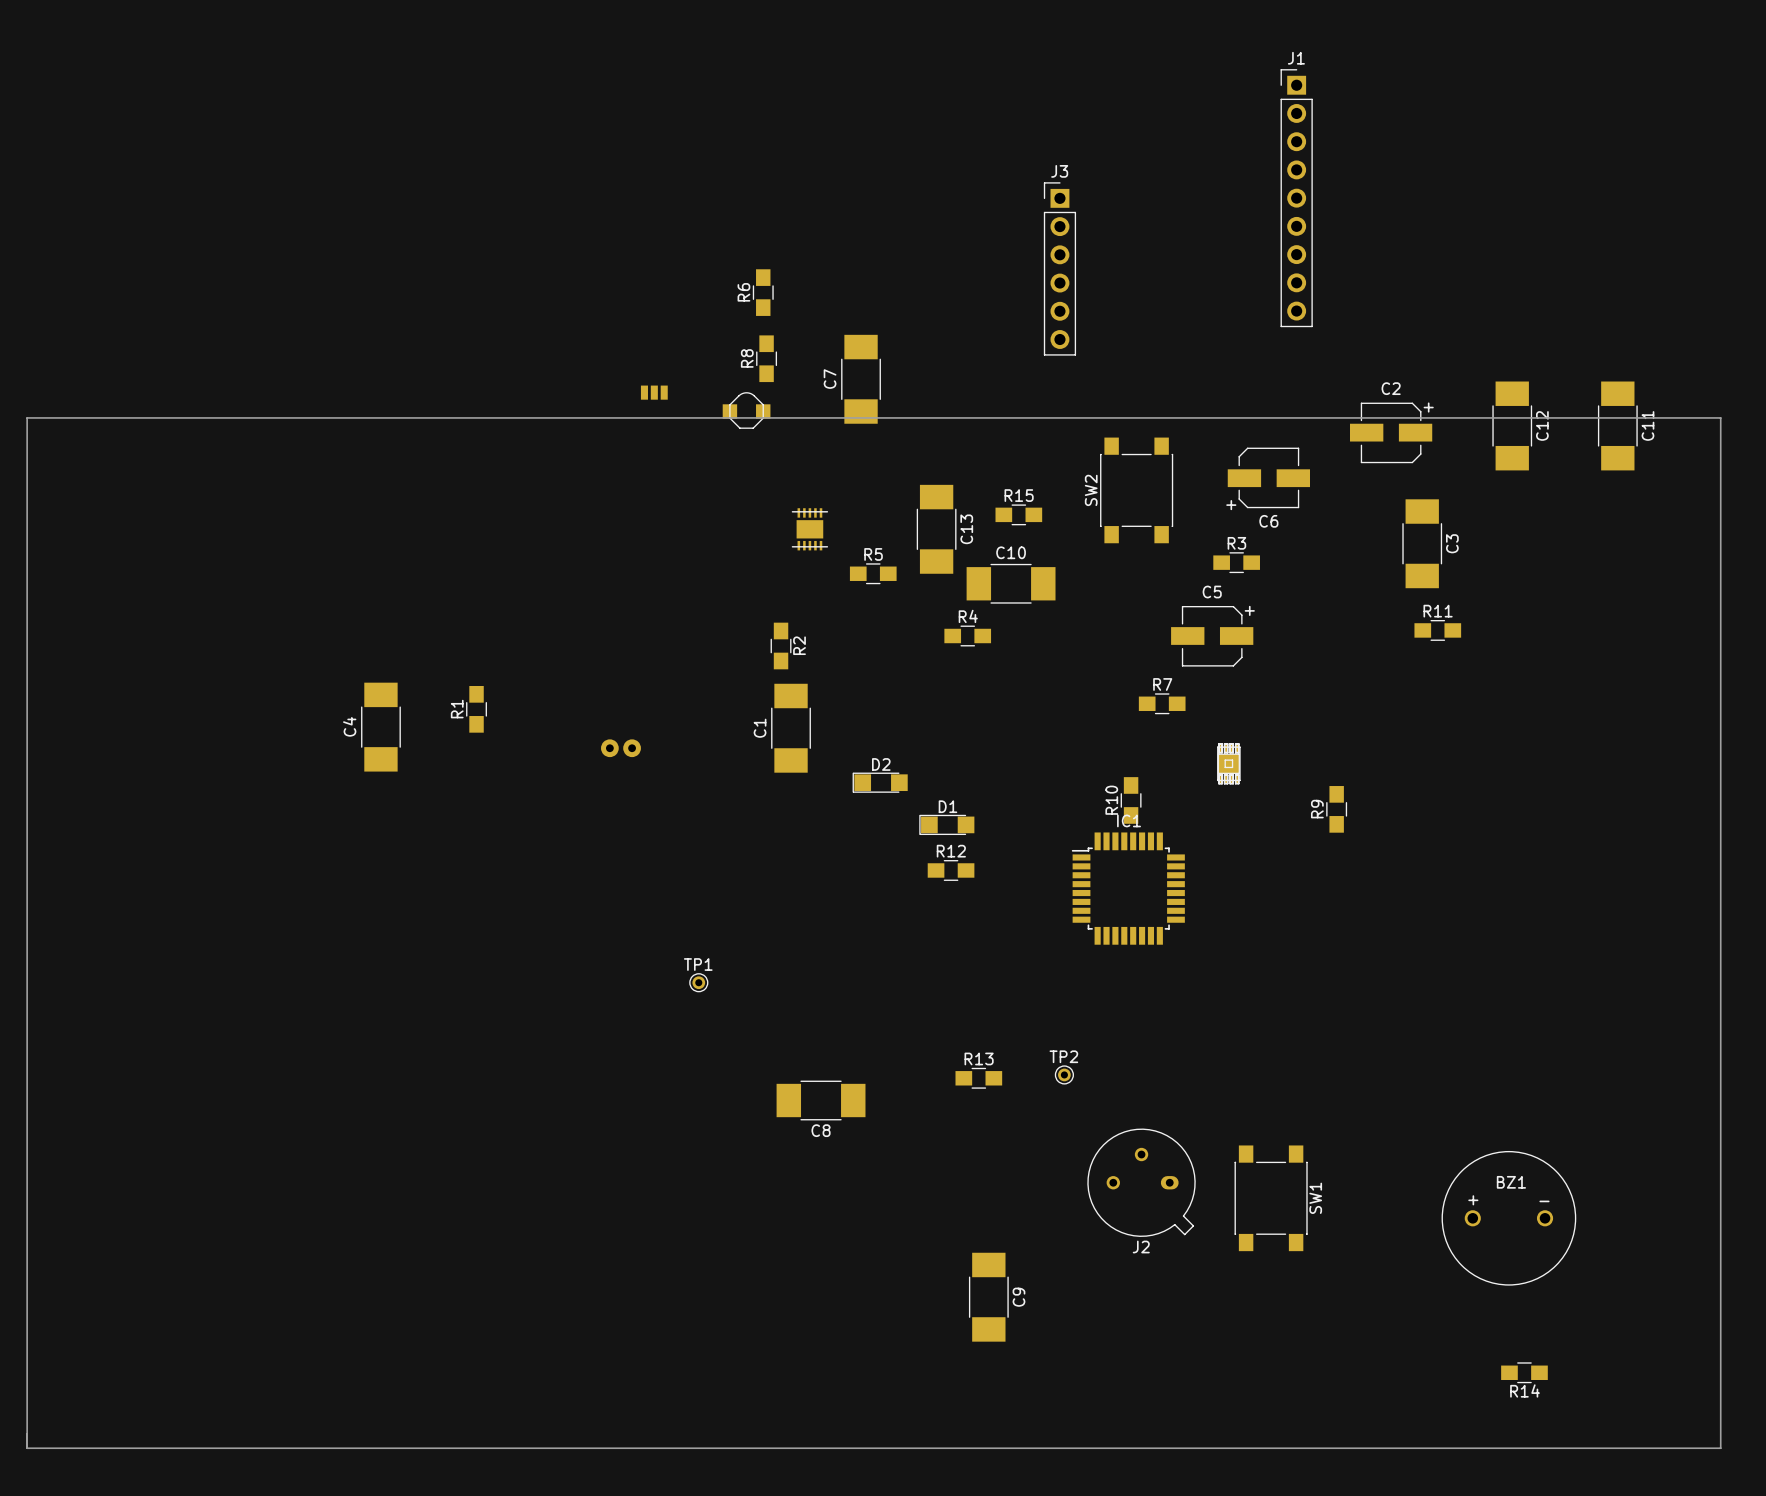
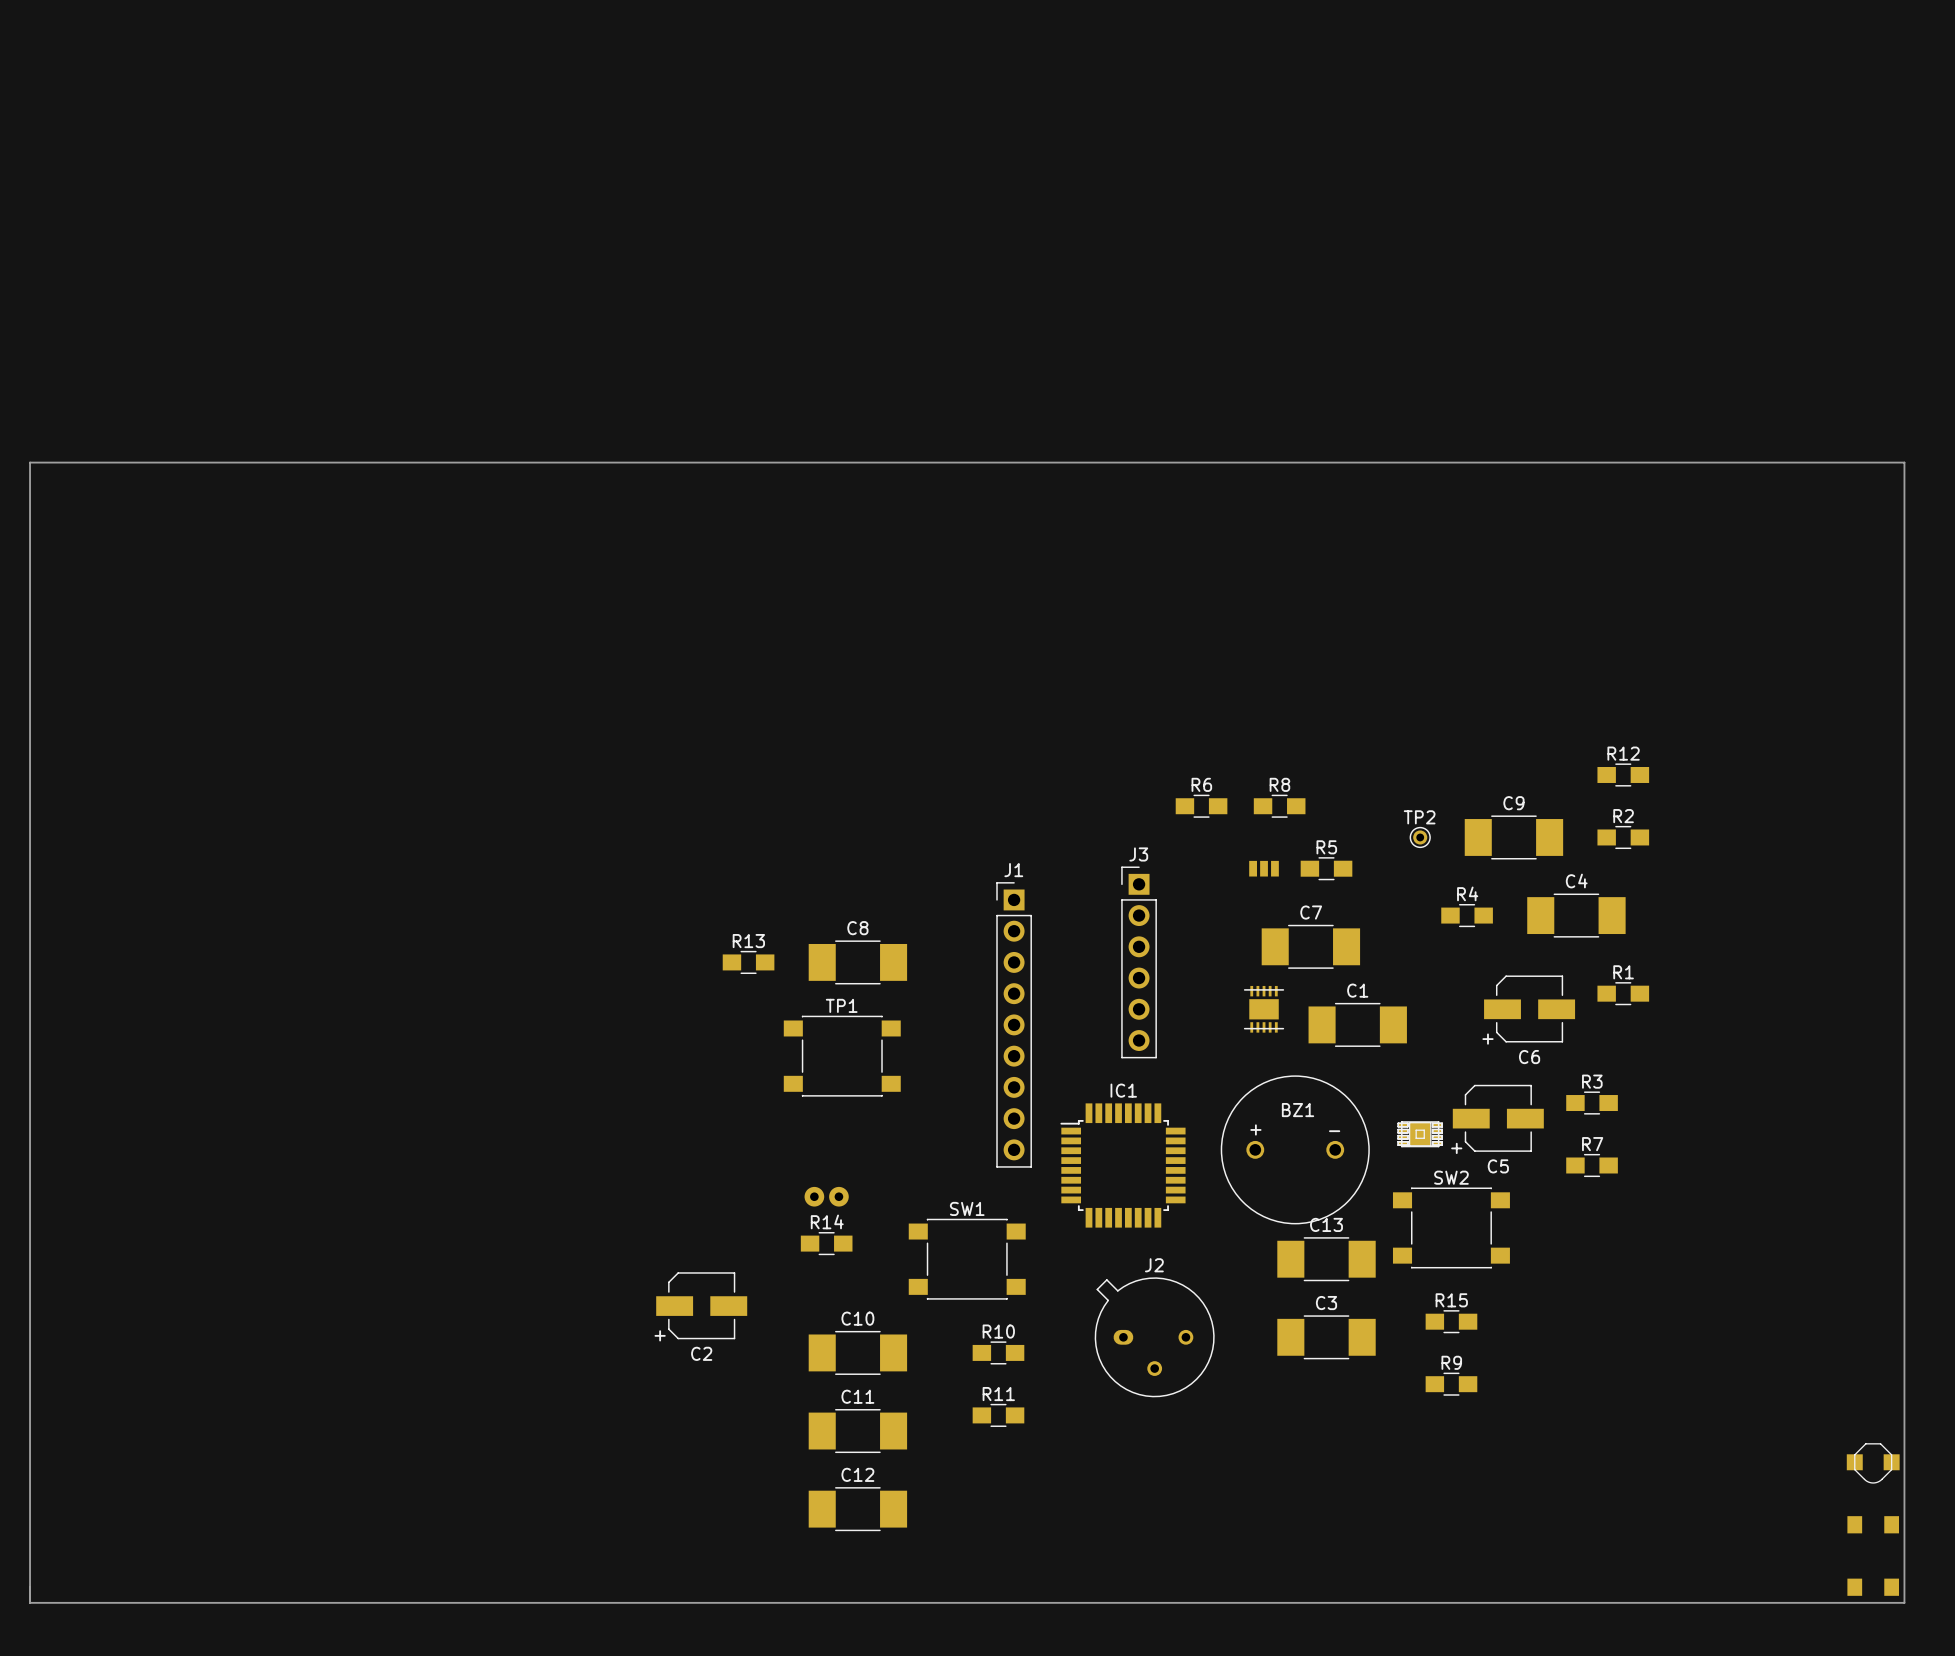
J1 position: (1296, 198) -> (1014, 1024)
J3 position: (1059, 268) -> (1139, 962)
R6 rotation: 0° (763, 292) -> 90° clockwise (1201, 806)
R6 position: (763, 292) -> (1201, 806)
R8 rotation: 0° (766, 358) -> 90° clockwise (1279, 806)
R8 position: (766, 358) -> (1279, 806)
C7 rotation: 0° (861, 379) -> 90° clockwise (1310, 946)
C7 position: (861, 379) -> (1310, 946)
part: (654, 392) -> none
part: (746, 410) -> none
C12 rotation: 0° (1512, 425) -> 90° clockwise (857, 1509)
C12 position: (1512, 425) -> (857, 1509)
C12 name position: C12 (1542, 425) -> C12 (857, 1474)
C11 rotation: 0° (1617, 425) -> 90° clockwise (857, 1431)
C11 position: (1617, 425) -> (857, 1431)
C11 name position: C11 (1647, 425) -> C11 (857, 1396)
C2 rotation: 0° (1391, 432) -> 180° (701, 1305)
C2 position: (1391, 432) -> (701, 1305)
C6 position: (1268, 477) -> (1529, 1008)
SW2 rotation: 0° (1136, 490) -> 90° clockwise (1451, 1227)
SW2 position: (1136, 490) -> (1451, 1227)
R15 position: (1018, 514) -> (1451, 1321)
part: (809, 529) -> none
C13 rotation: 0° (936, 529) -> 90° clockwise (1326, 1259)
C13 position: (936, 529) -> (1326, 1259)
C13 name position: C13 (966, 529) -> C13 (1326, 1224)
C3 rotation: 0° (1422, 543) -> 90° clockwise (1326, 1337)
C3 position: (1422, 543) -> (1326, 1337)
C3 name position: C3 (1452, 543) -> C3 (1326, 1303)
R3 position: (1236, 562) -> (1592, 1103)
R5 position: (873, 573) -> (1326, 868)
C10 position: (1011, 583) -> (857, 1352)
R11 position: (1437, 630) -> (998, 1415)
R4 position: (967, 635) -> (1467, 915)
C5 rotation: 0° (1212, 636) -> 180° (1498, 1118)
C5 position: (1212, 636) -> (1498, 1118)
R2 rotation: 0° (781, 645) -> 90° clockwise (1623, 837)
R2 position: (781, 645) -> (1623, 837)
R2 name position: R2 (799, 645) -> R2 (1623, 816)
R7 position: (1162, 703) -> (1592, 1165)
R1 rotation: 0° (476, 709) -> 90° clockwise (1623, 993)
R1 position: (476, 709) -> (1623, 993)
C4 rotation: 0° (380, 727) -> 90° clockwise (1576, 915)
C4 position: (380, 727) -> (1576, 915)
C1 rotation: 0° (791, 728) -> 90° clockwise (1357, 1024)
C1 position: (791, 728) -> (1357, 1024)
part: (620, 748) -> none
part rotation: 0° (1228, 763) -> 90° clockwise (1420, 1134)
part position: (1228, 763) -> (1420, 1134)
D2: (880, 782) -> none
part: none -> (1264, 868)
R10 rotation: 0° (1131, 800) -> 90° clockwise (998, 1352)
R10 position: (1131, 800) -> (998, 1352)
R9 rotation: 0° (1336, 809) -> 90° clockwise (1451, 1384)
R9 position: (1336, 809) -> (1451, 1384)
D1: (946, 824) -> none
R12 position: (951, 870) -> (1623, 774)
IC1 position: (1128, 888) -> (1122, 1165)
part: none -> (1264, 1009)
TP1 name position: TP1 (698, 964) -> TP1 (841, 1005)
TP1 footprint: [689, 973, 709, 993] -> [783, 1015, 901, 1097]
TP2 position: (1064, 1074) -> (1420, 837)
R13 position: (978, 1078) -> (748, 962)
part: none -> (826, 1196)
C8 position: (821, 1100) -> (857, 962)
C8 name position: C8 (821, 1130) -> C8 (857, 928)
J2 rotation: 0° (1141, 1182) -> 180° (1154, 1337)
J2 position: (1141, 1182) -> (1154, 1337)
SW1 rotation: 0° (1271, 1198) -> 90° clockwise (967, 1259)
SW1 position: (1271, 1198) -> (967, 1259)
SW1 name position: SW1 (1315, 1198) -> SW1 (967, 1208)
BZ1 position: (1508, 1218) -> (1295, 1149)
C9 rotation: 0° (988, 1297) -> 90° clockwise (1513, 837)
C9 position: (988, 1297) -> (1513, 837)
C9 name position: C9 (1018, 1297) -> C9 (1513, 803)
part: none -> (1873, 1463)
R14 position: (1524, 1372) -> (826, 1243)
part: none -> (1873, 1524)
R14 name position: R14 (1525, 1390) -> R14 (827, 1221)
part: none -> (1873, 1587)

